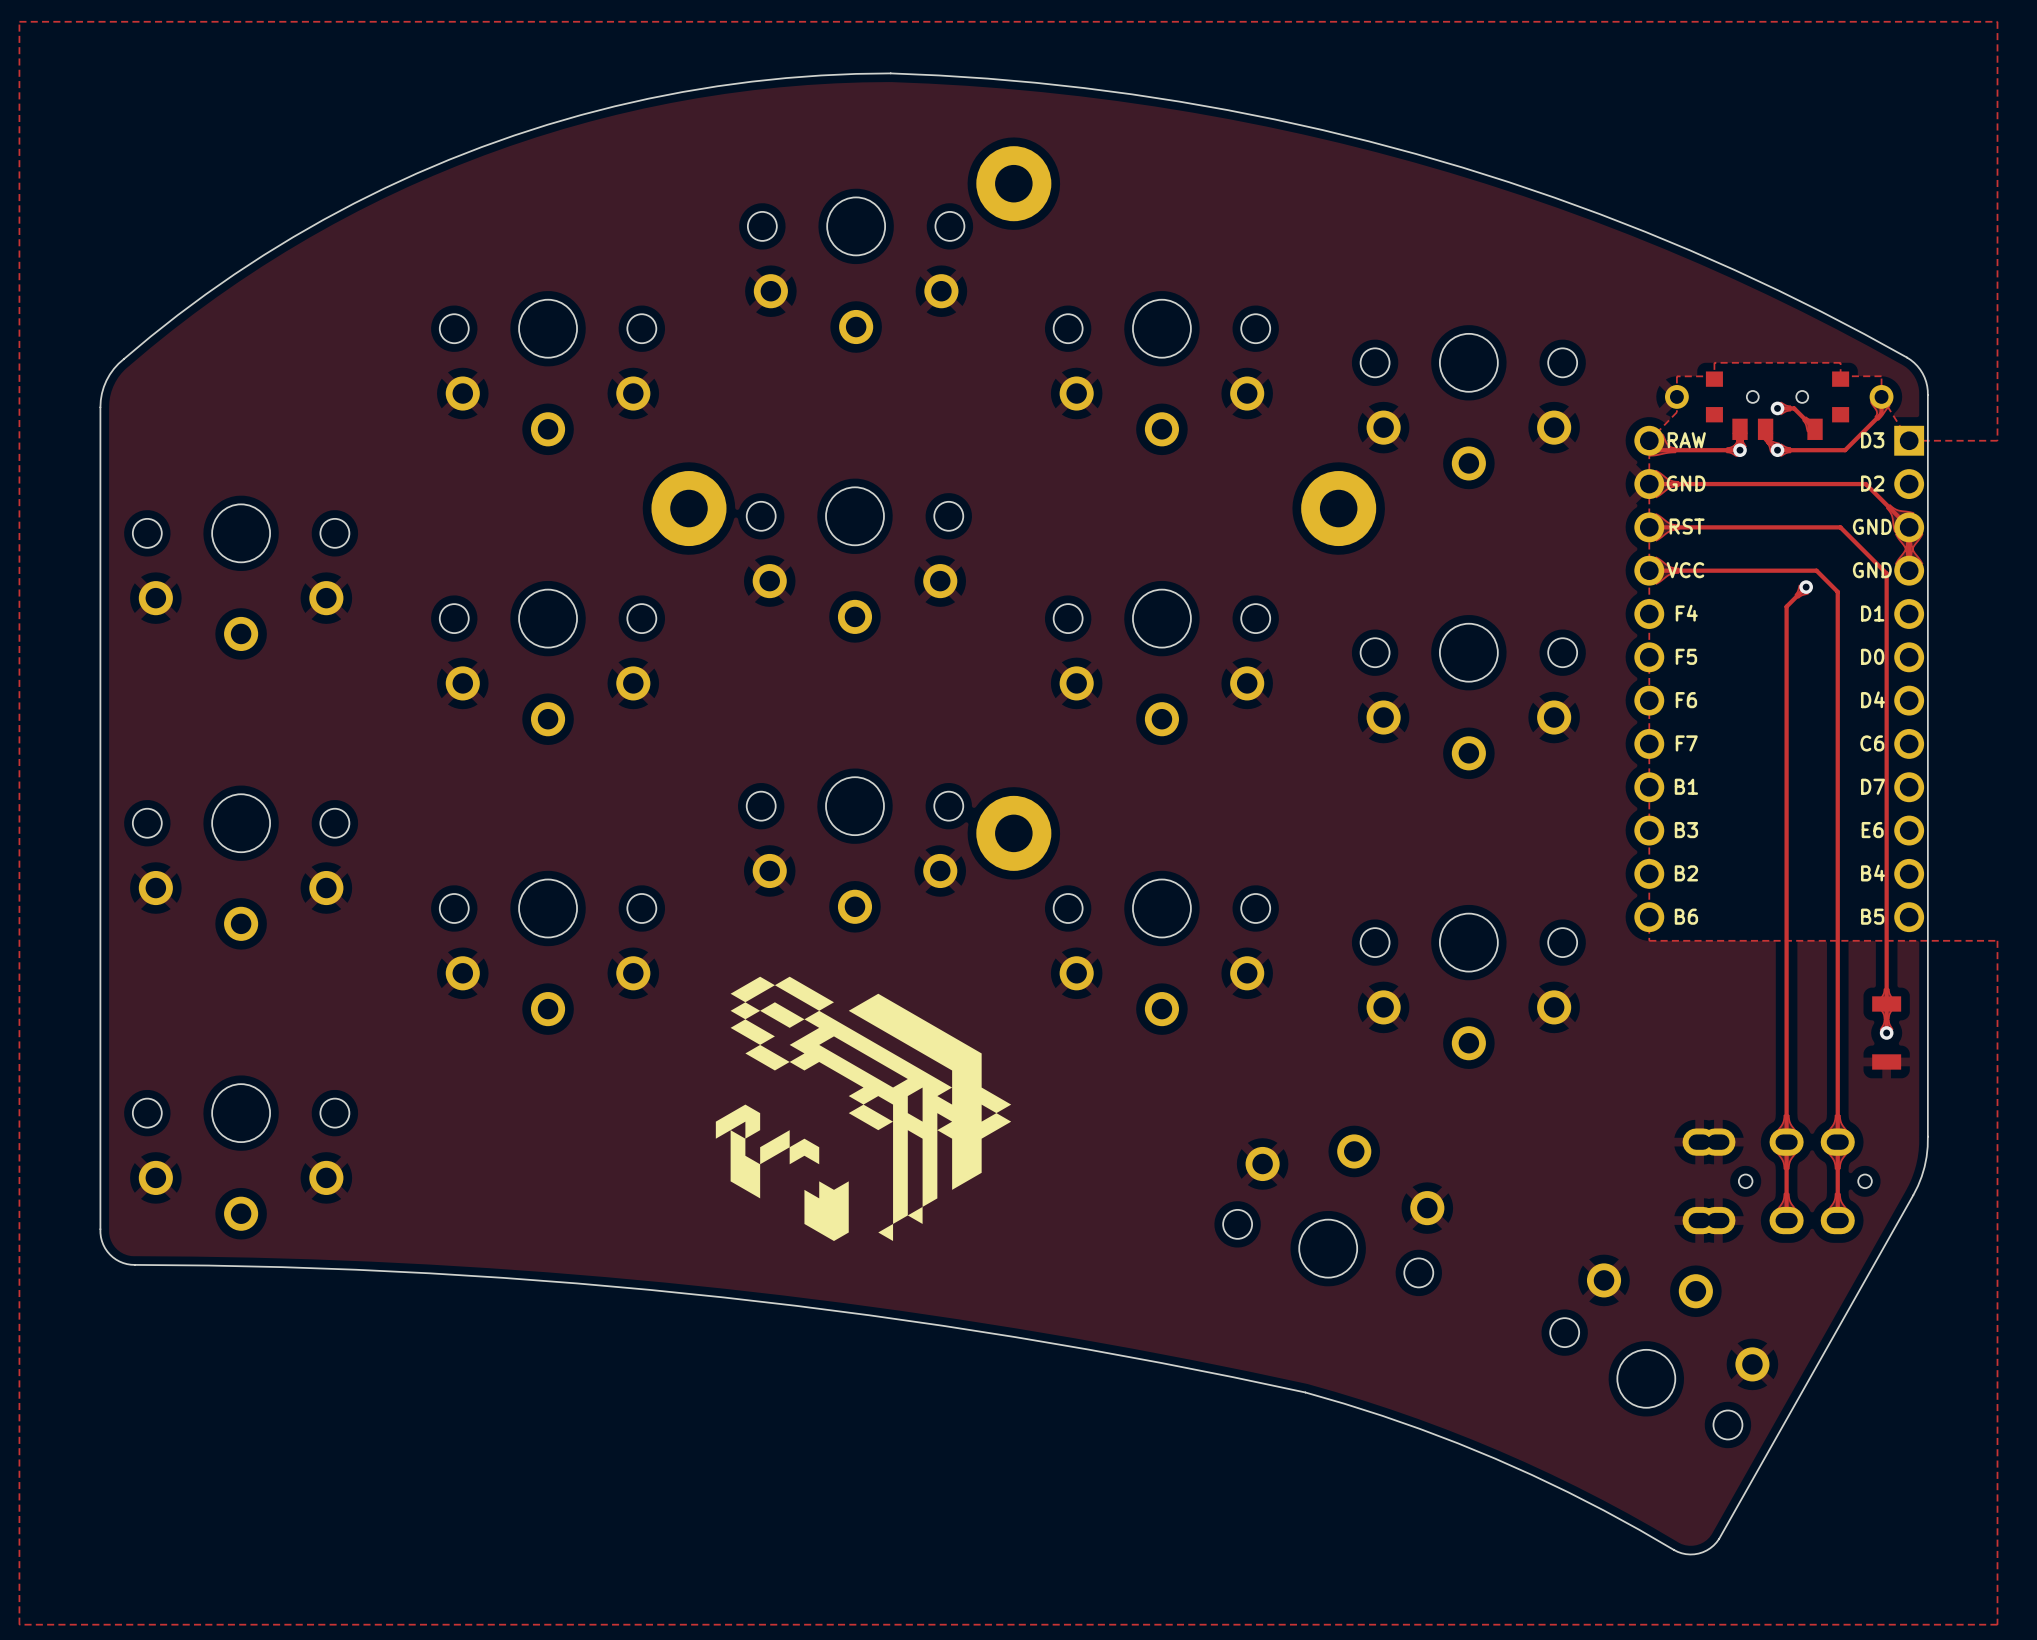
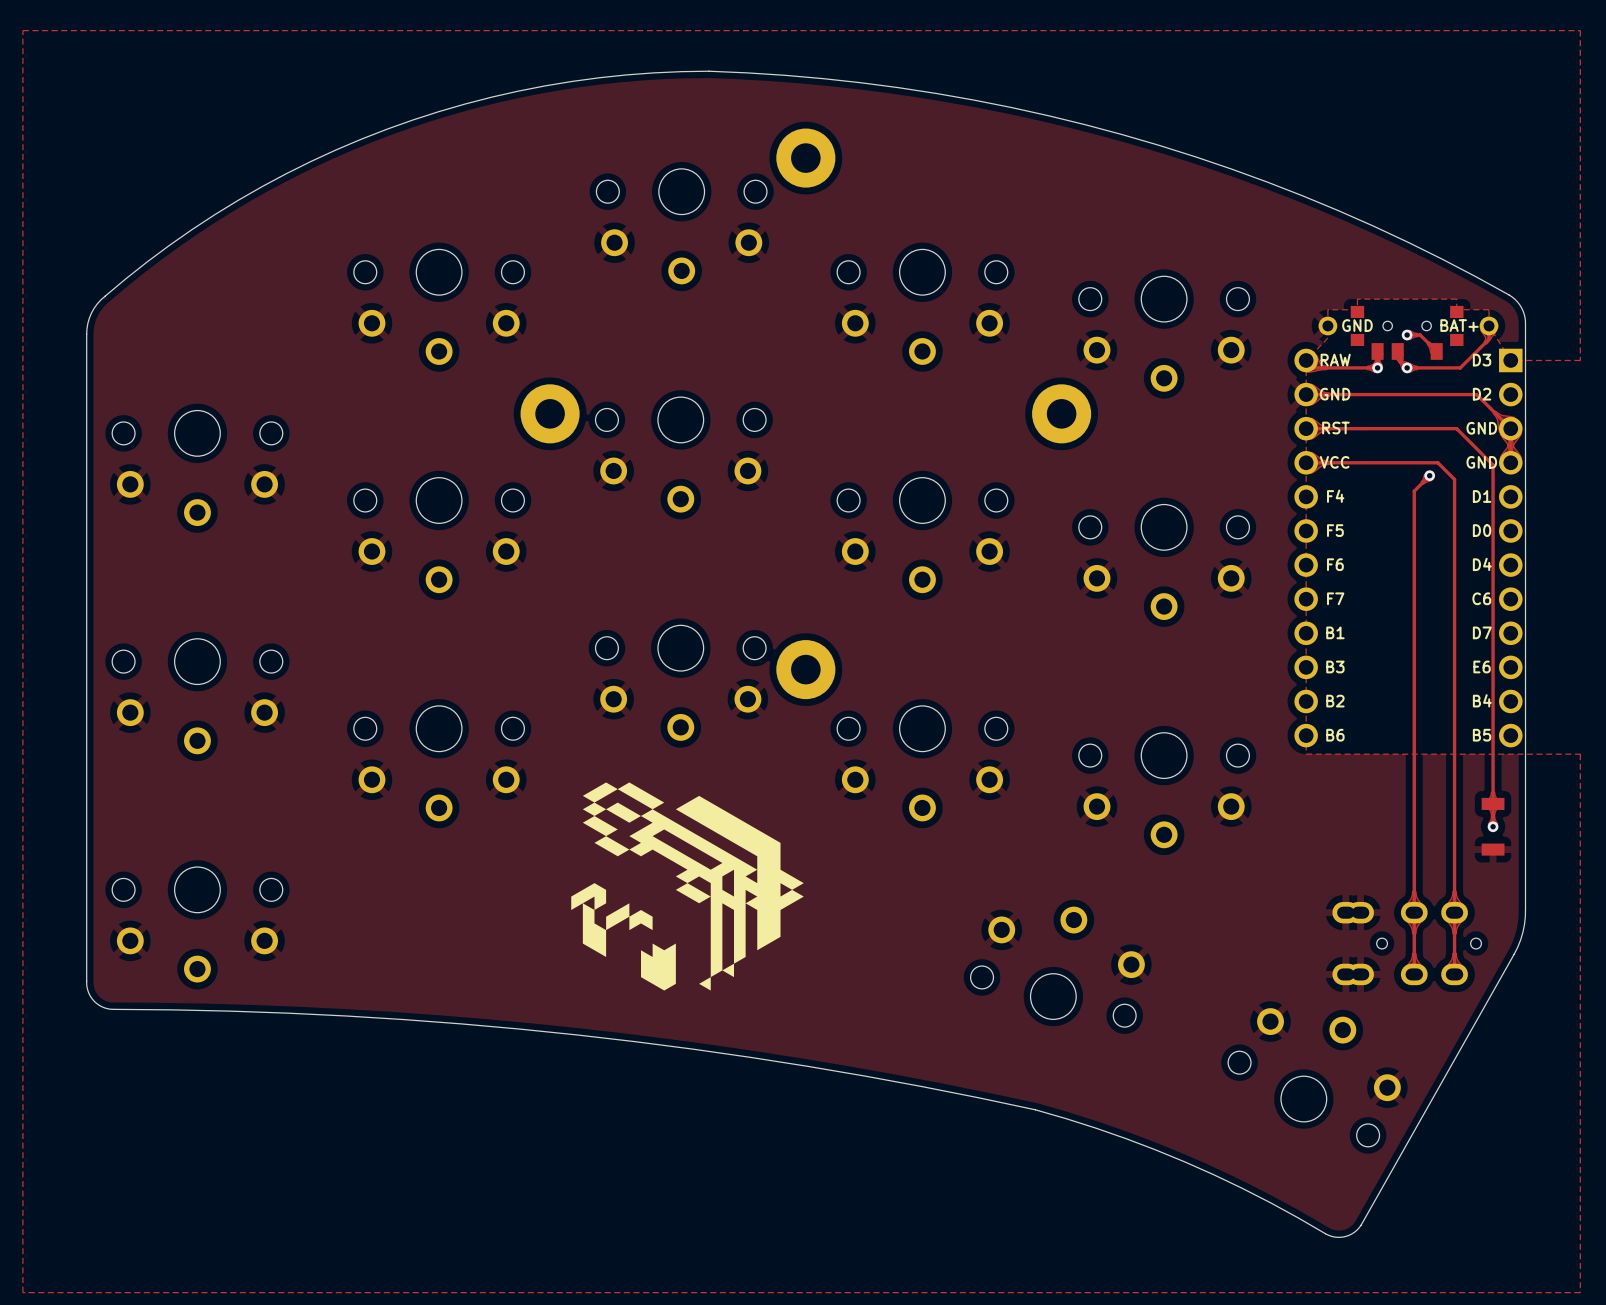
text: none -> GND (1357, 325)
text: none -> BAT+ (1459, 325)

